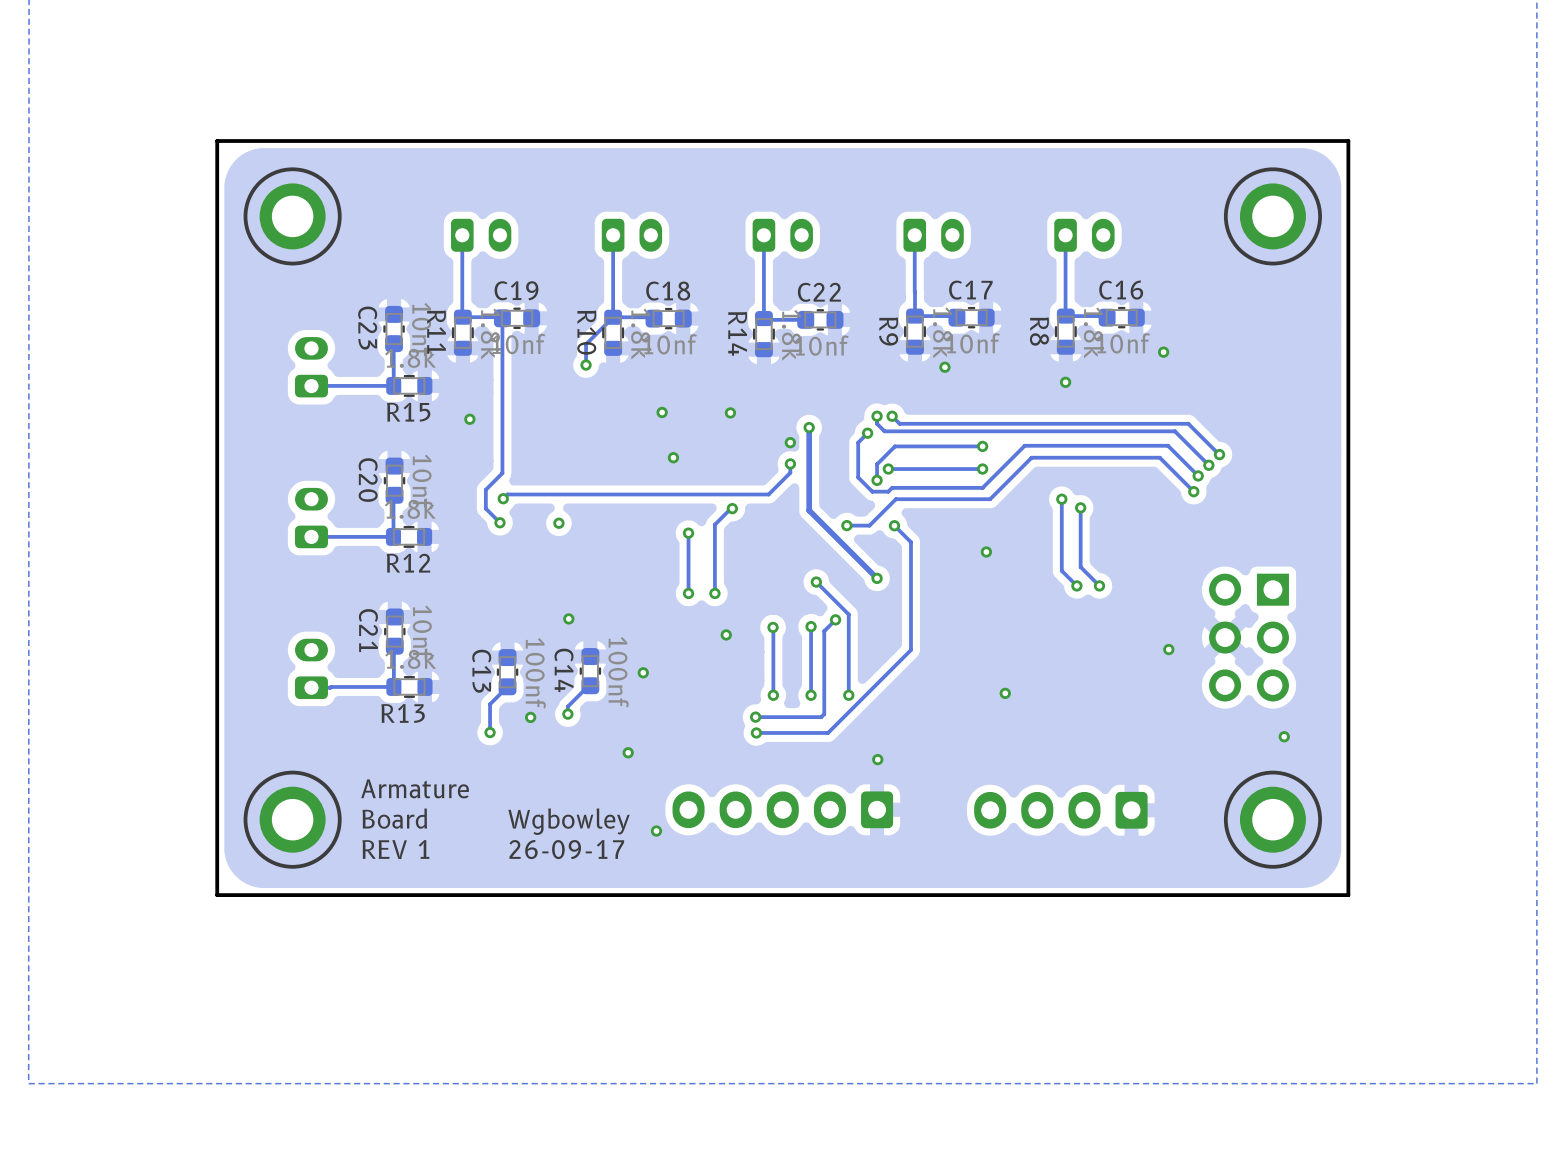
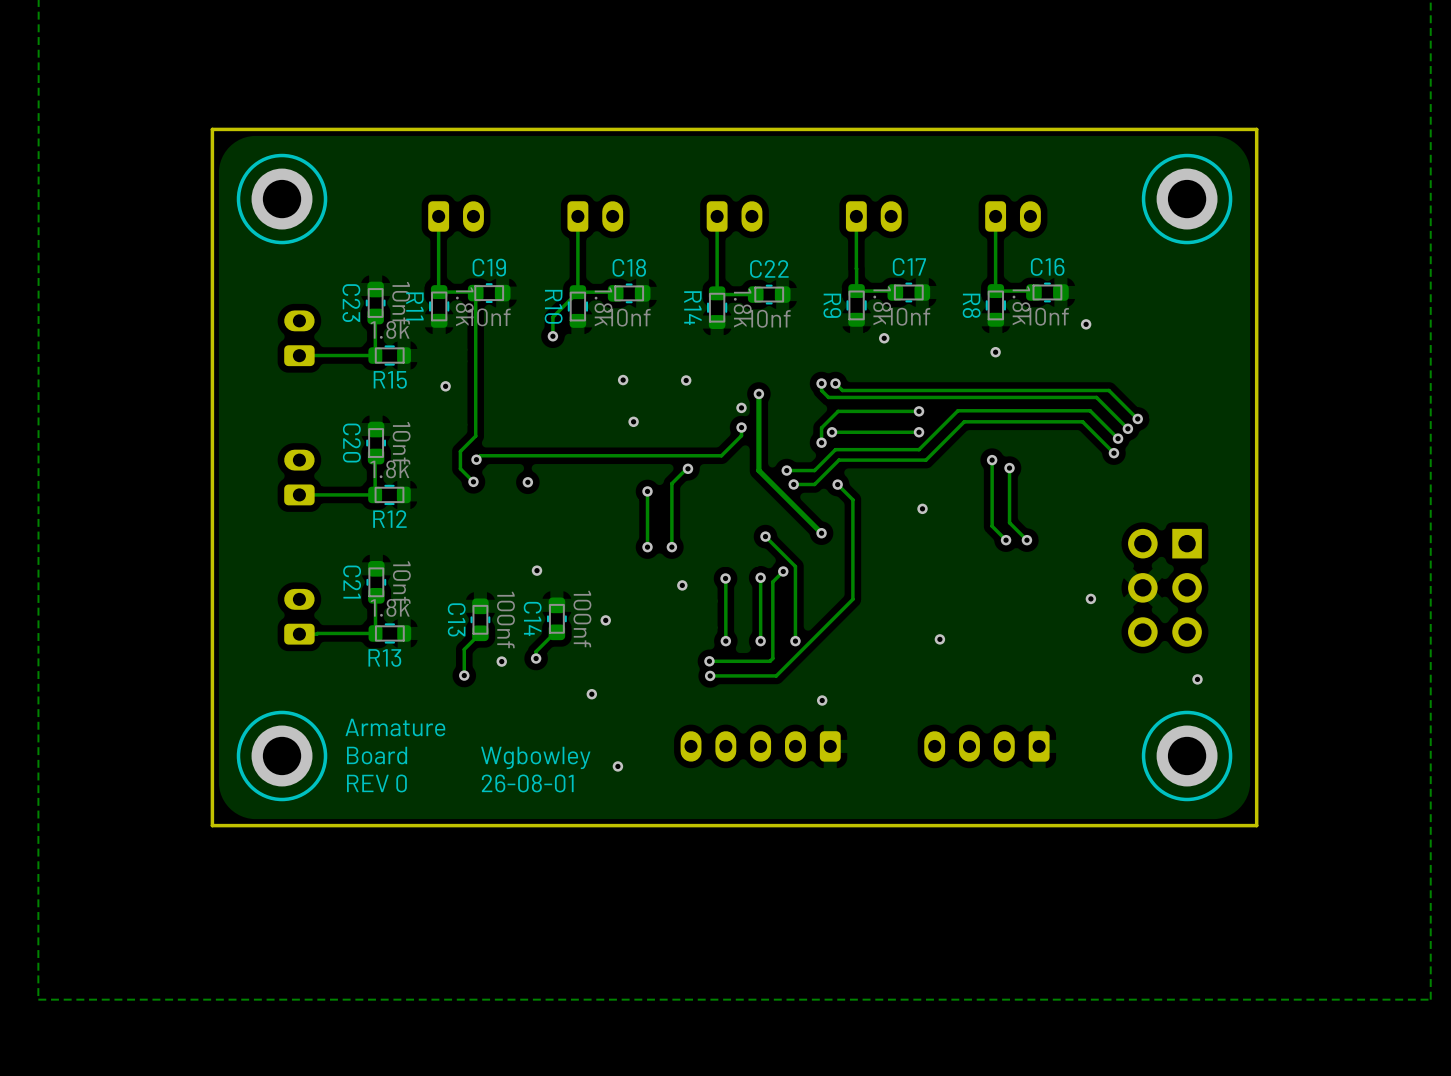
track: (867, 433) (858, 442) (858, 477) (872, 491) (888, 491) -> (786, 470) (814, 470) (832, 453)
via position: (867, 433) -> (786, 470)
part footprint: [974, 791, 1148, 829] -> [924, 731, 1050, 762]
part: (782, 809) -> none
part: none -> (760, 746)
text: REV 1 (395, 849) -> REV 0 (376, 783)
text: 26-09-17 (566, 849) -> 26-08-01 (527, 783)

